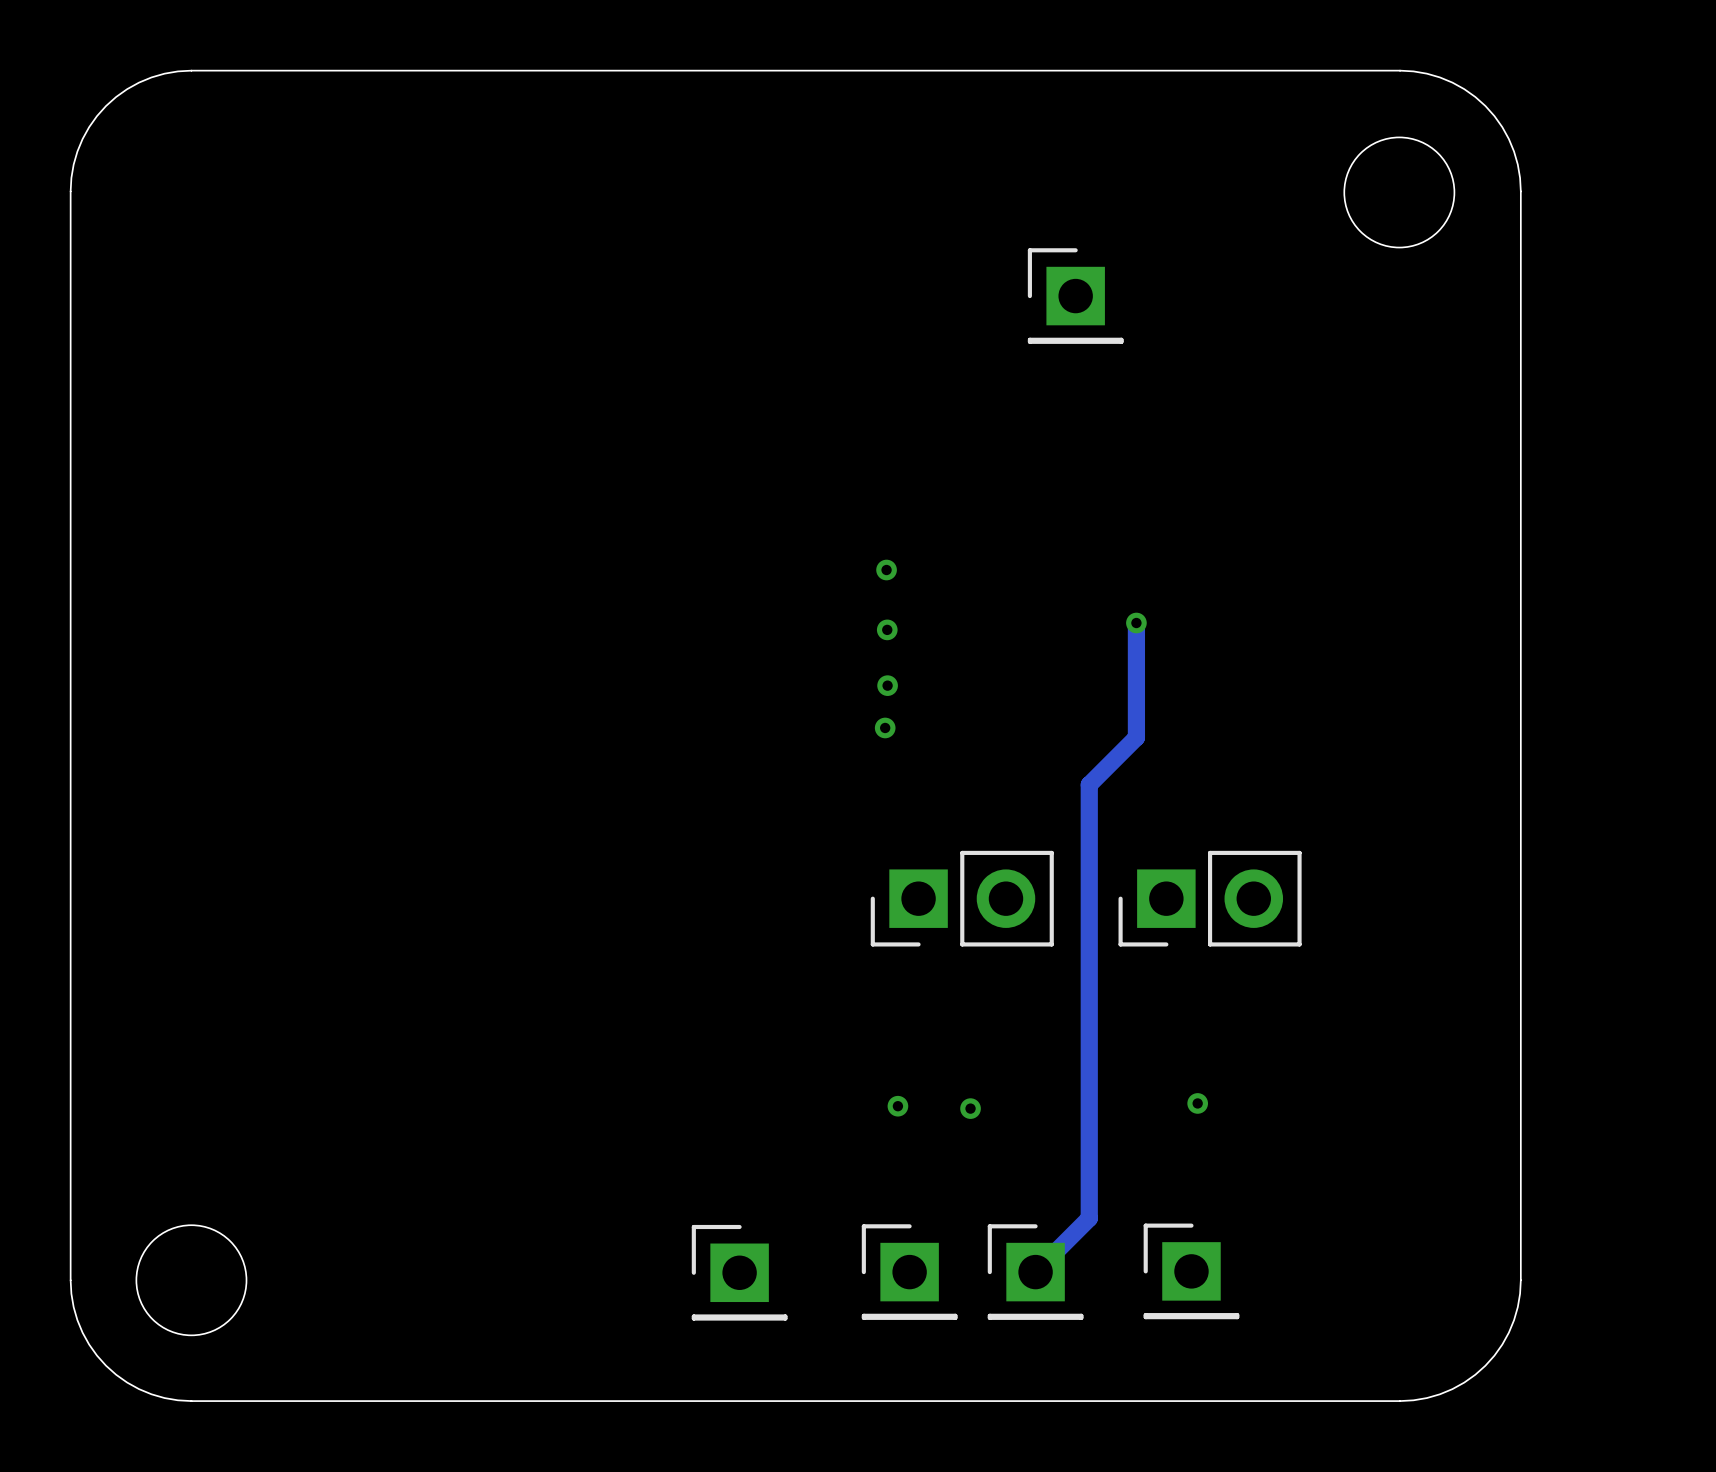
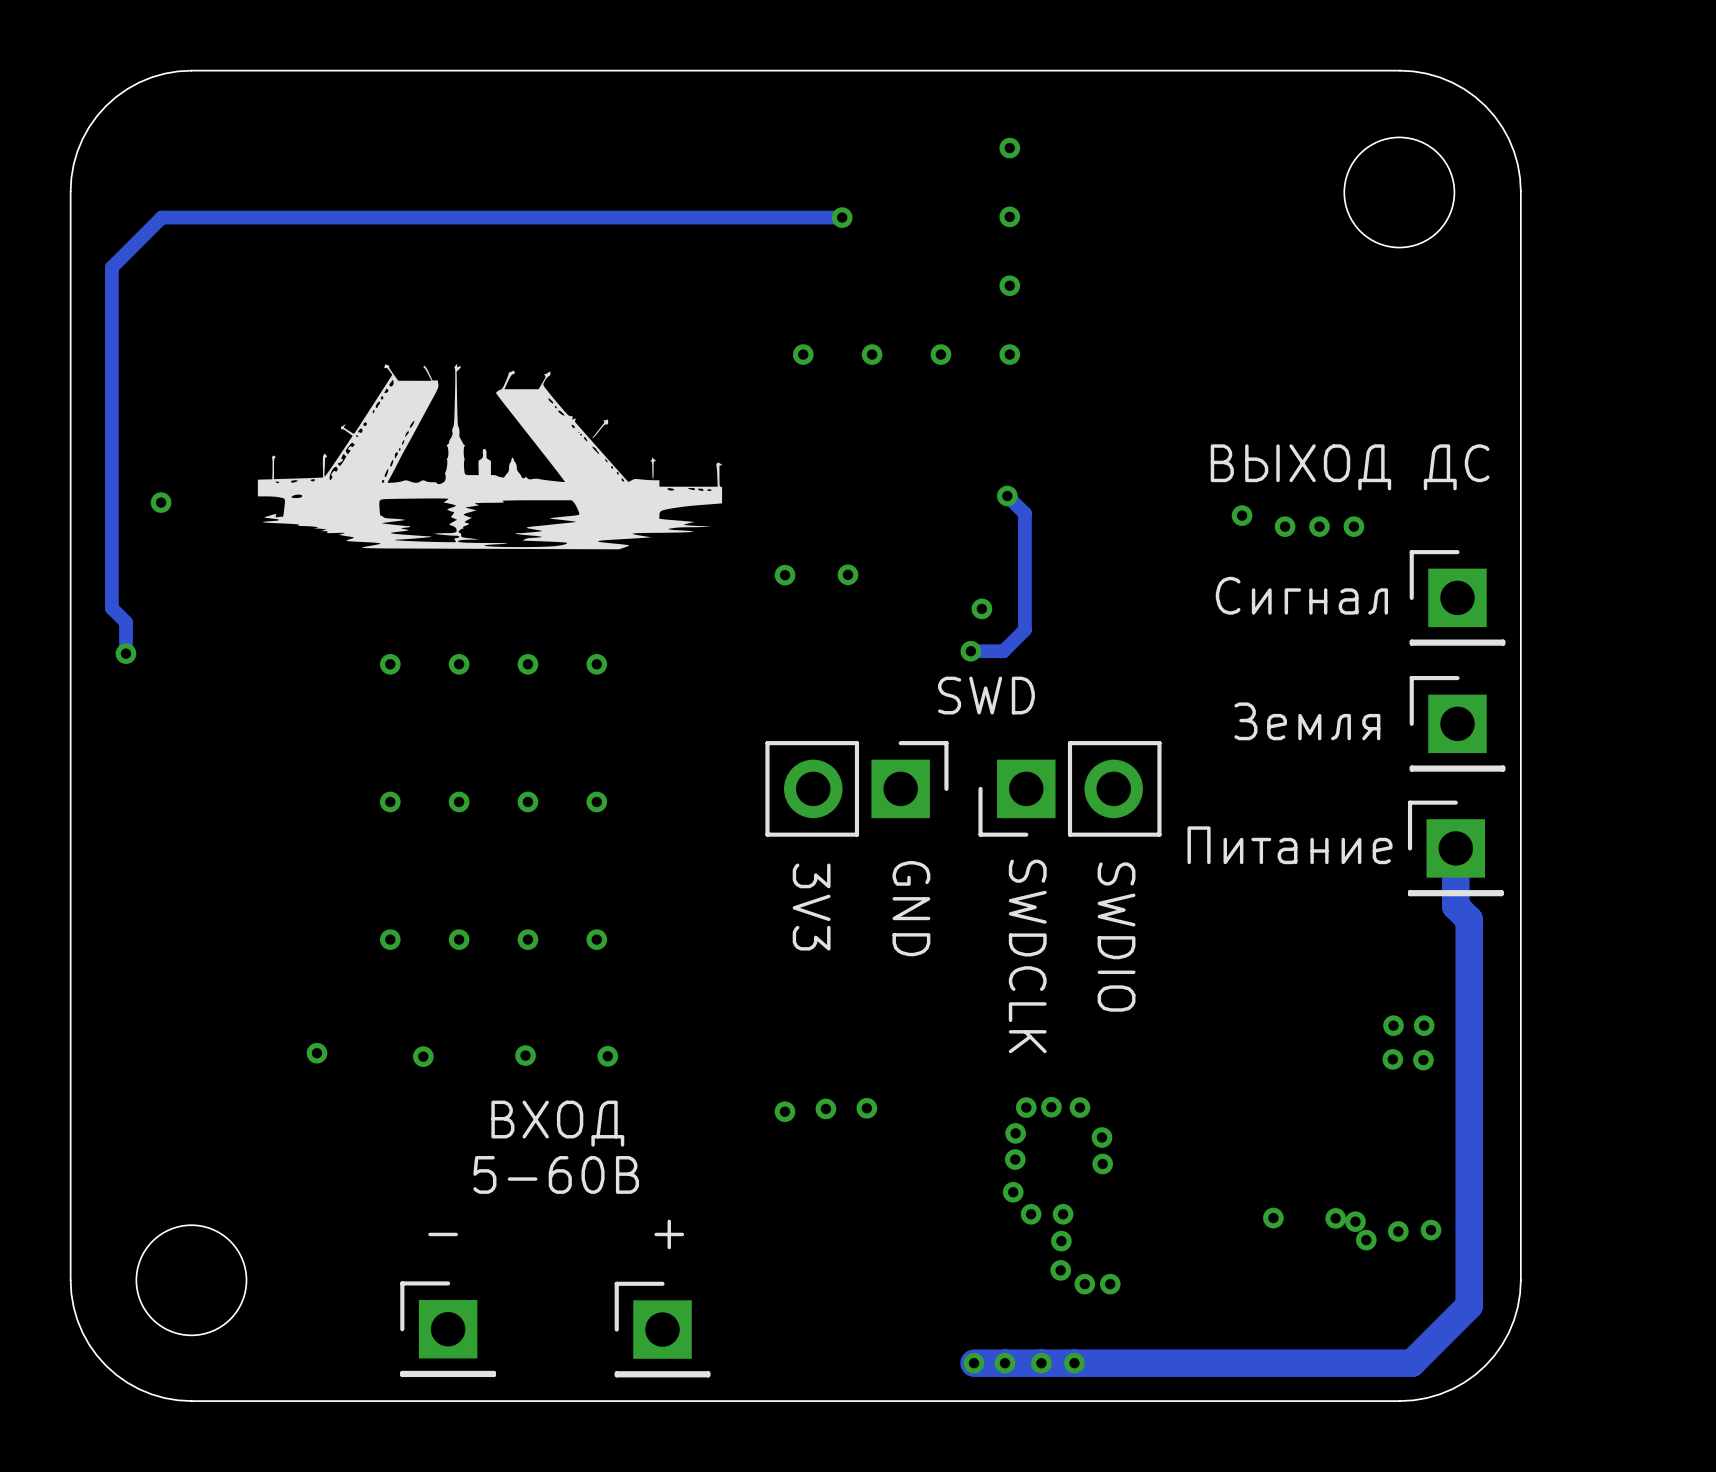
via: none -> (1009, 148)
via: none -> (1009, 216)
track: none -> (842, 217) (161, 217) (111, 267) (111, 608) (125, 622) (125, 653)
via: none -> (842, 217)
via: none -> (1009, 285)
part: (1075, 296) -> none
via: none -> (803, 354)
via: none -> (872, 354)
via: none -> (940, 354)
via: none -> (1009, 354)
drawing: none -> [257, 364, 723, 550]
text: none -> ВЫХОД ДС (1350, 467)
track: none -> (1007, 496) (1024, 513) (1024, 629) (1003, 651) (970, 651)
via: none -> (1007, 496)
via: none -> (161, 502)
via: none -> (1242, 515)
via: none -> (1285, 526)
via: none -> (1319, 526)
via: none -> (1353, 526)
via: (886, 570) -> none
via: none -> (848, 574)
via: none -> (785, 575)
text: none -> Сигнал (1301, 595)
part: none -> (1457, 597)
via: none -> (981, 608)
track: (1136, 623) (1136, 737) (1089, 784) (1089, 1218) (1035, 1272) -> none
via: (1136, 623) -> none
via: (887, 629) -> none
via: none -> (970, 651)
via: none -> (125, 653)
via: none -> (390, 664)
via: none -> (459, 664)
via: none -> (527, 664)
via: none -> (596, 664)
via: (887, 685) -> none
text: none -> SWD (986, 695)
text: none -> Земля (1307, 721)
part: none -> (1457, 723)
via: (885, 727) -> none
part: none -> (856, 788)
part: none -> (1070, 788)
via: none -> (390, 801)
via: none -> (459, 801)
via: none -> (527, 801)
via: none -> (596, 801)
text: none -> Питание (1290, 845)
track: none -> (1455, 848) (1455, 906) (1469, 919) (1469, 1305) (1411, 1363) (973, 1363)
part: none -> (1455, 848)
part: (962, 898) -> none
part: (1210, 898) -> none
text: none -> 3V3 (811, 907)
text: none -> GND (911, 908)
text: none -> SWDIO (1116, 937)
via: none -> (390, 939)
via: none -> (459, 939)
via: none -> (527, 939)
via: none -> (596, 939)
text: none -> SWDCLK (1027, 956)
via: none -> (1393, 1025)
via: none -> (1424, 1025)
via: none -> (316, 1053)
via: none -> (525, 1055)
via: none -> (423, 1056)
via: none -> (607, 1056)
via: none -> (1392, 1059)
via: none -> (1423, 1060)
via: (1197, 1103) -> none
via position: (897, 1106) -> (866, 1108)
via: none -> (1026, 1107)
via: none -> (1051, 1107)
via: none -> (1079, 1107)
via: none -> (825, 1108)
via: (970, 1108) -> none
via: none -> (784, 1111)
text: none -> ВХОД (557, 1123)
via: none -> (1015, 1133)
via: none -> (1102, 1137)
via: none -> (1015, 1159)
via: none -> (1102, 1164)
text: none -> 5-60В (556, 1174)
via: none -> (1013, 1192)
via: none -> (1031, 1214)
via: none -> (1063, 1214)
via: none -> (1273, 1218)
via: none -> (1335, 1218)
via: none -> (1355, 1221)
via: none -> (1431, 1230)
via: none -> (1398, 1231)
text: none -> - + (556, 1234)
via: none -> (1366, 1240)
via: none -> (1061, 1241)
via: none -> (1060, 1270)
part: (1191, 1271) -> none
part position: (739, 1272) -> (662, 1329)
part: (909, 1272) -> none
part: (1035, 1272) -> none
via: none -> (1084, 1284)
via: none -> (1110, 1284)
part: none -> (448, 1329)
via: none -> (973, 1363)
via: none -> (1004, 1363)
via: none -> (1041, 1363)
via: none -> (1074, 1363)

